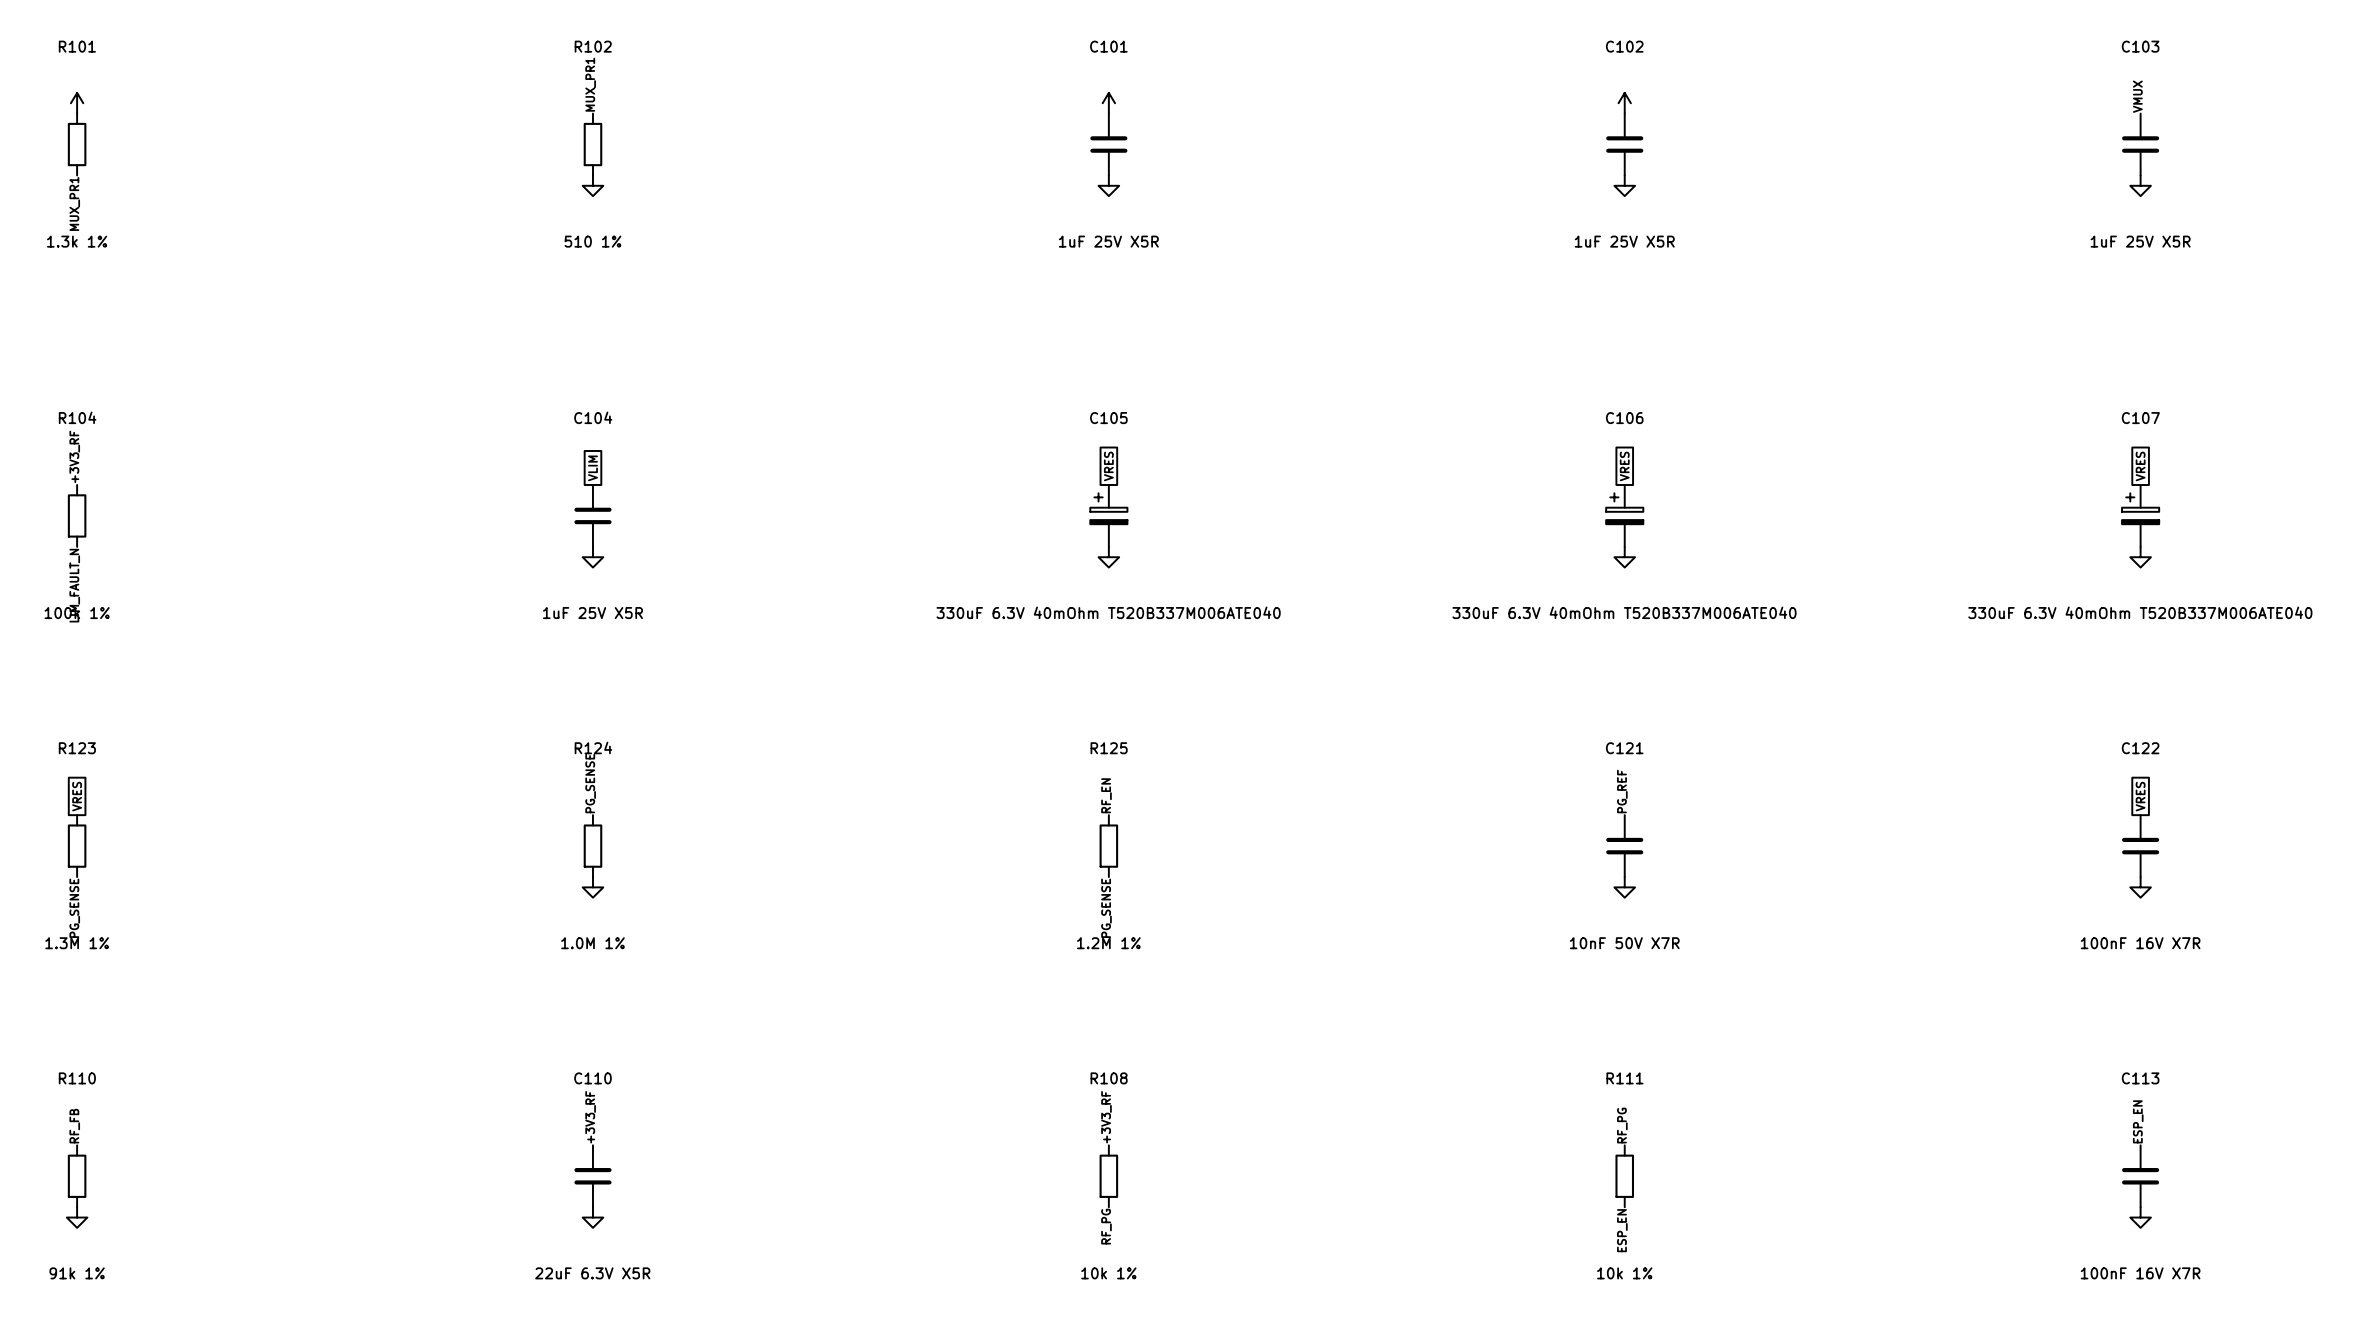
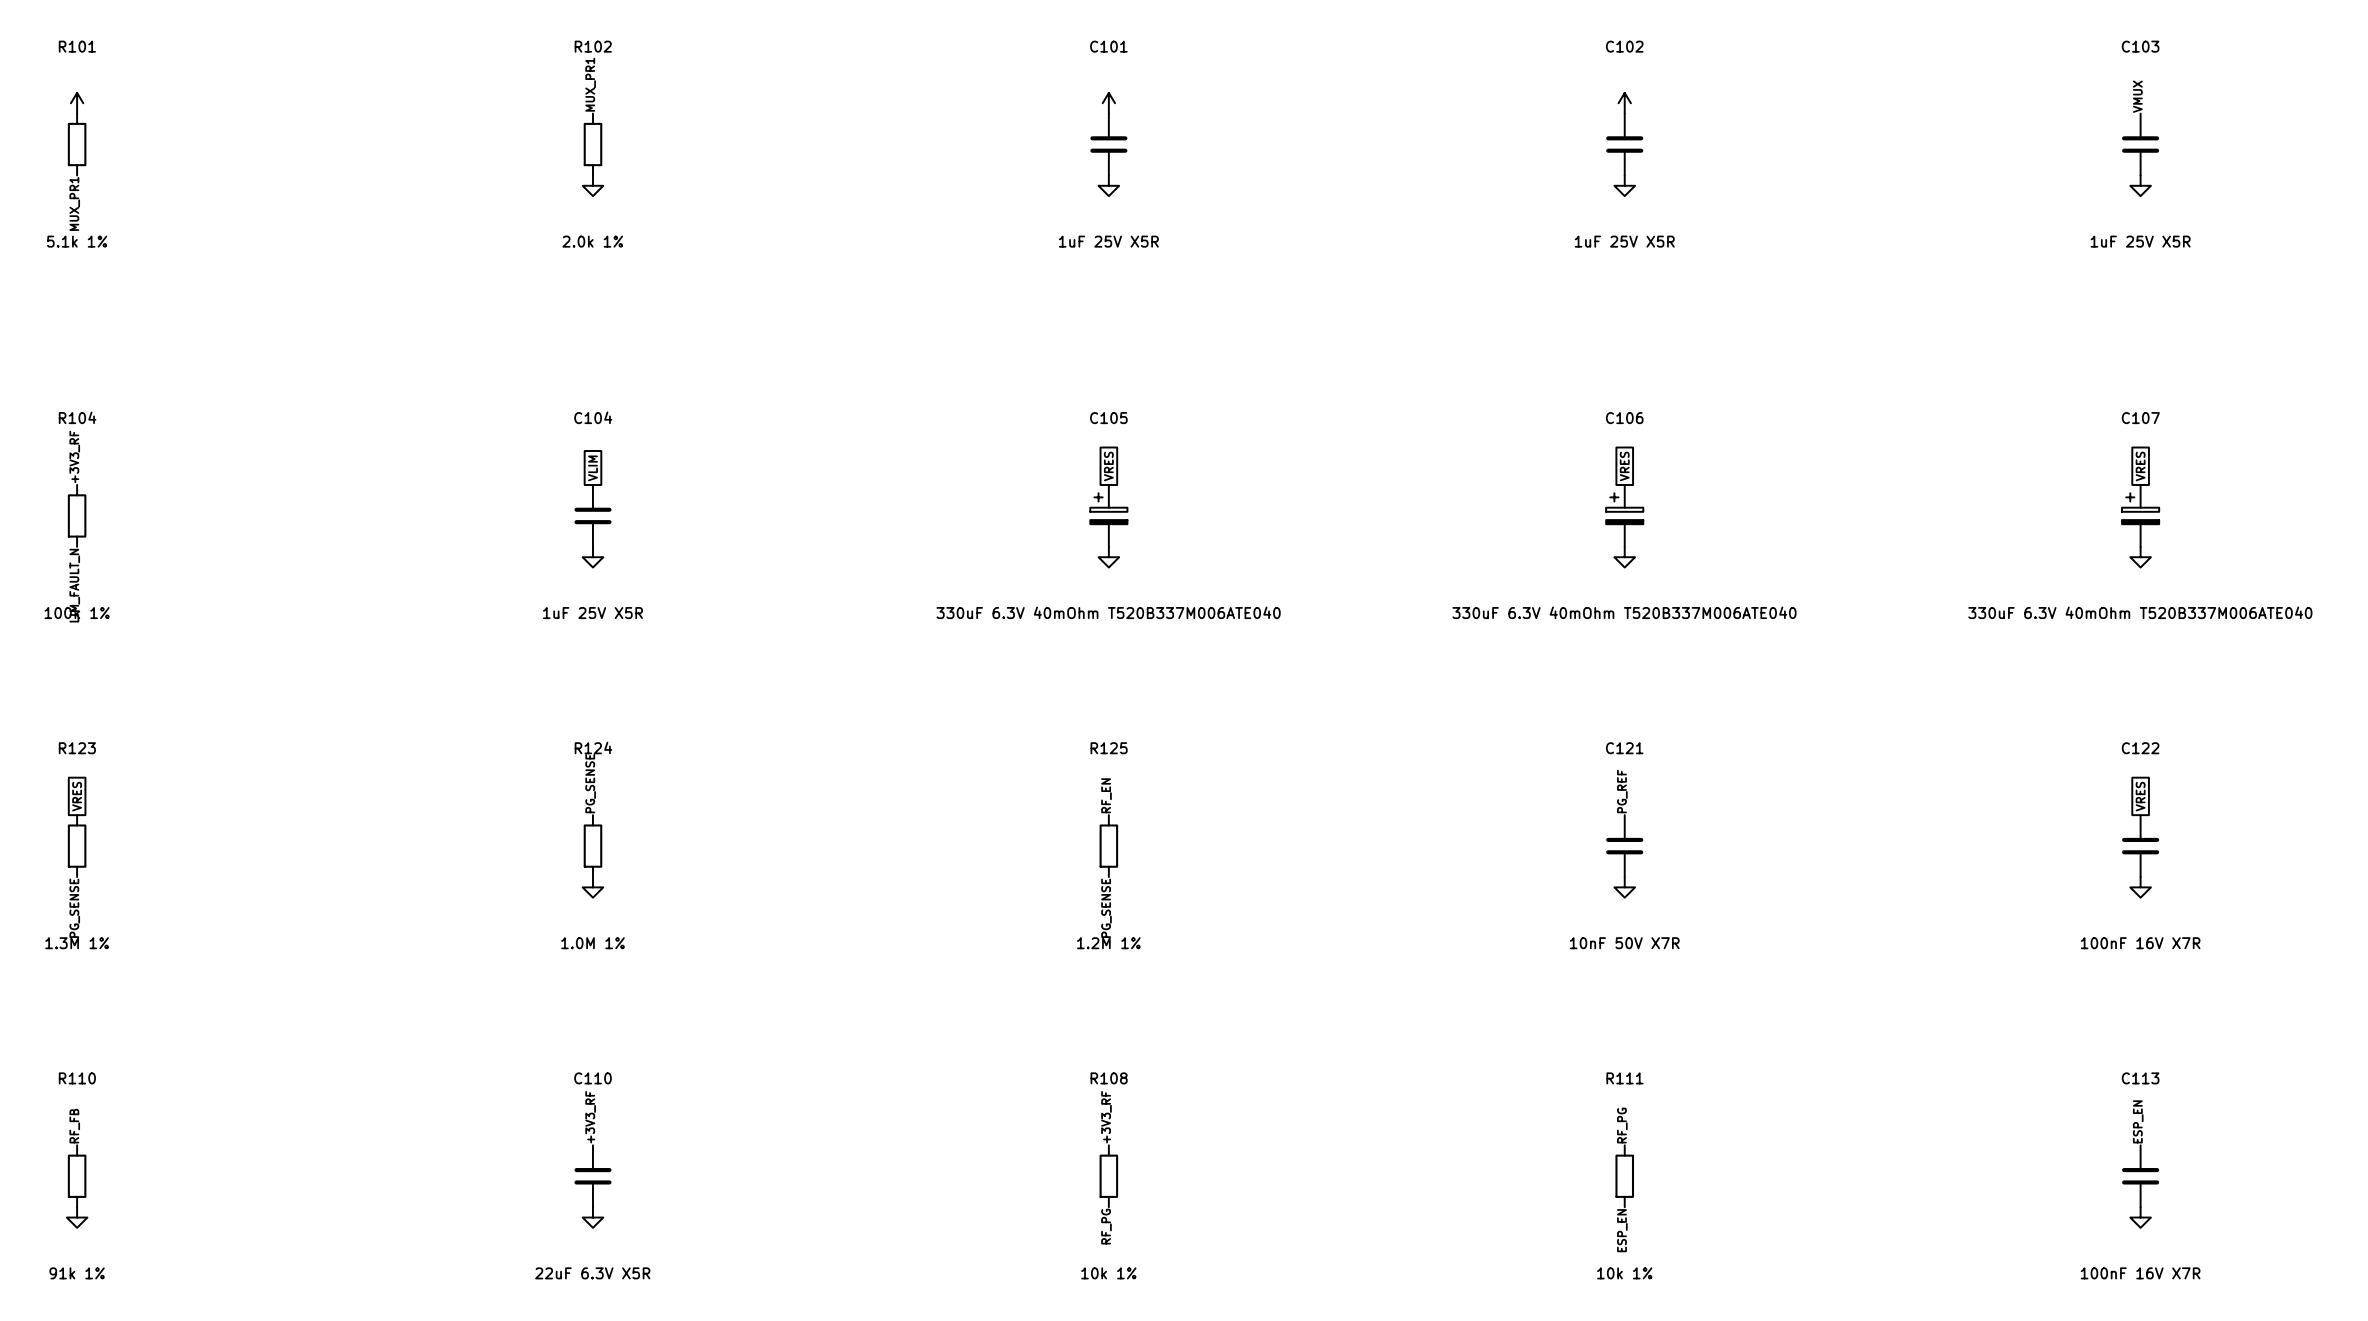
R101 value: 1.3k 1% (77, 241) -> 5.1k 1% (77, 241)
R102 value: 510 1% (592, 241) -> 2.0k 1% (592, 241)

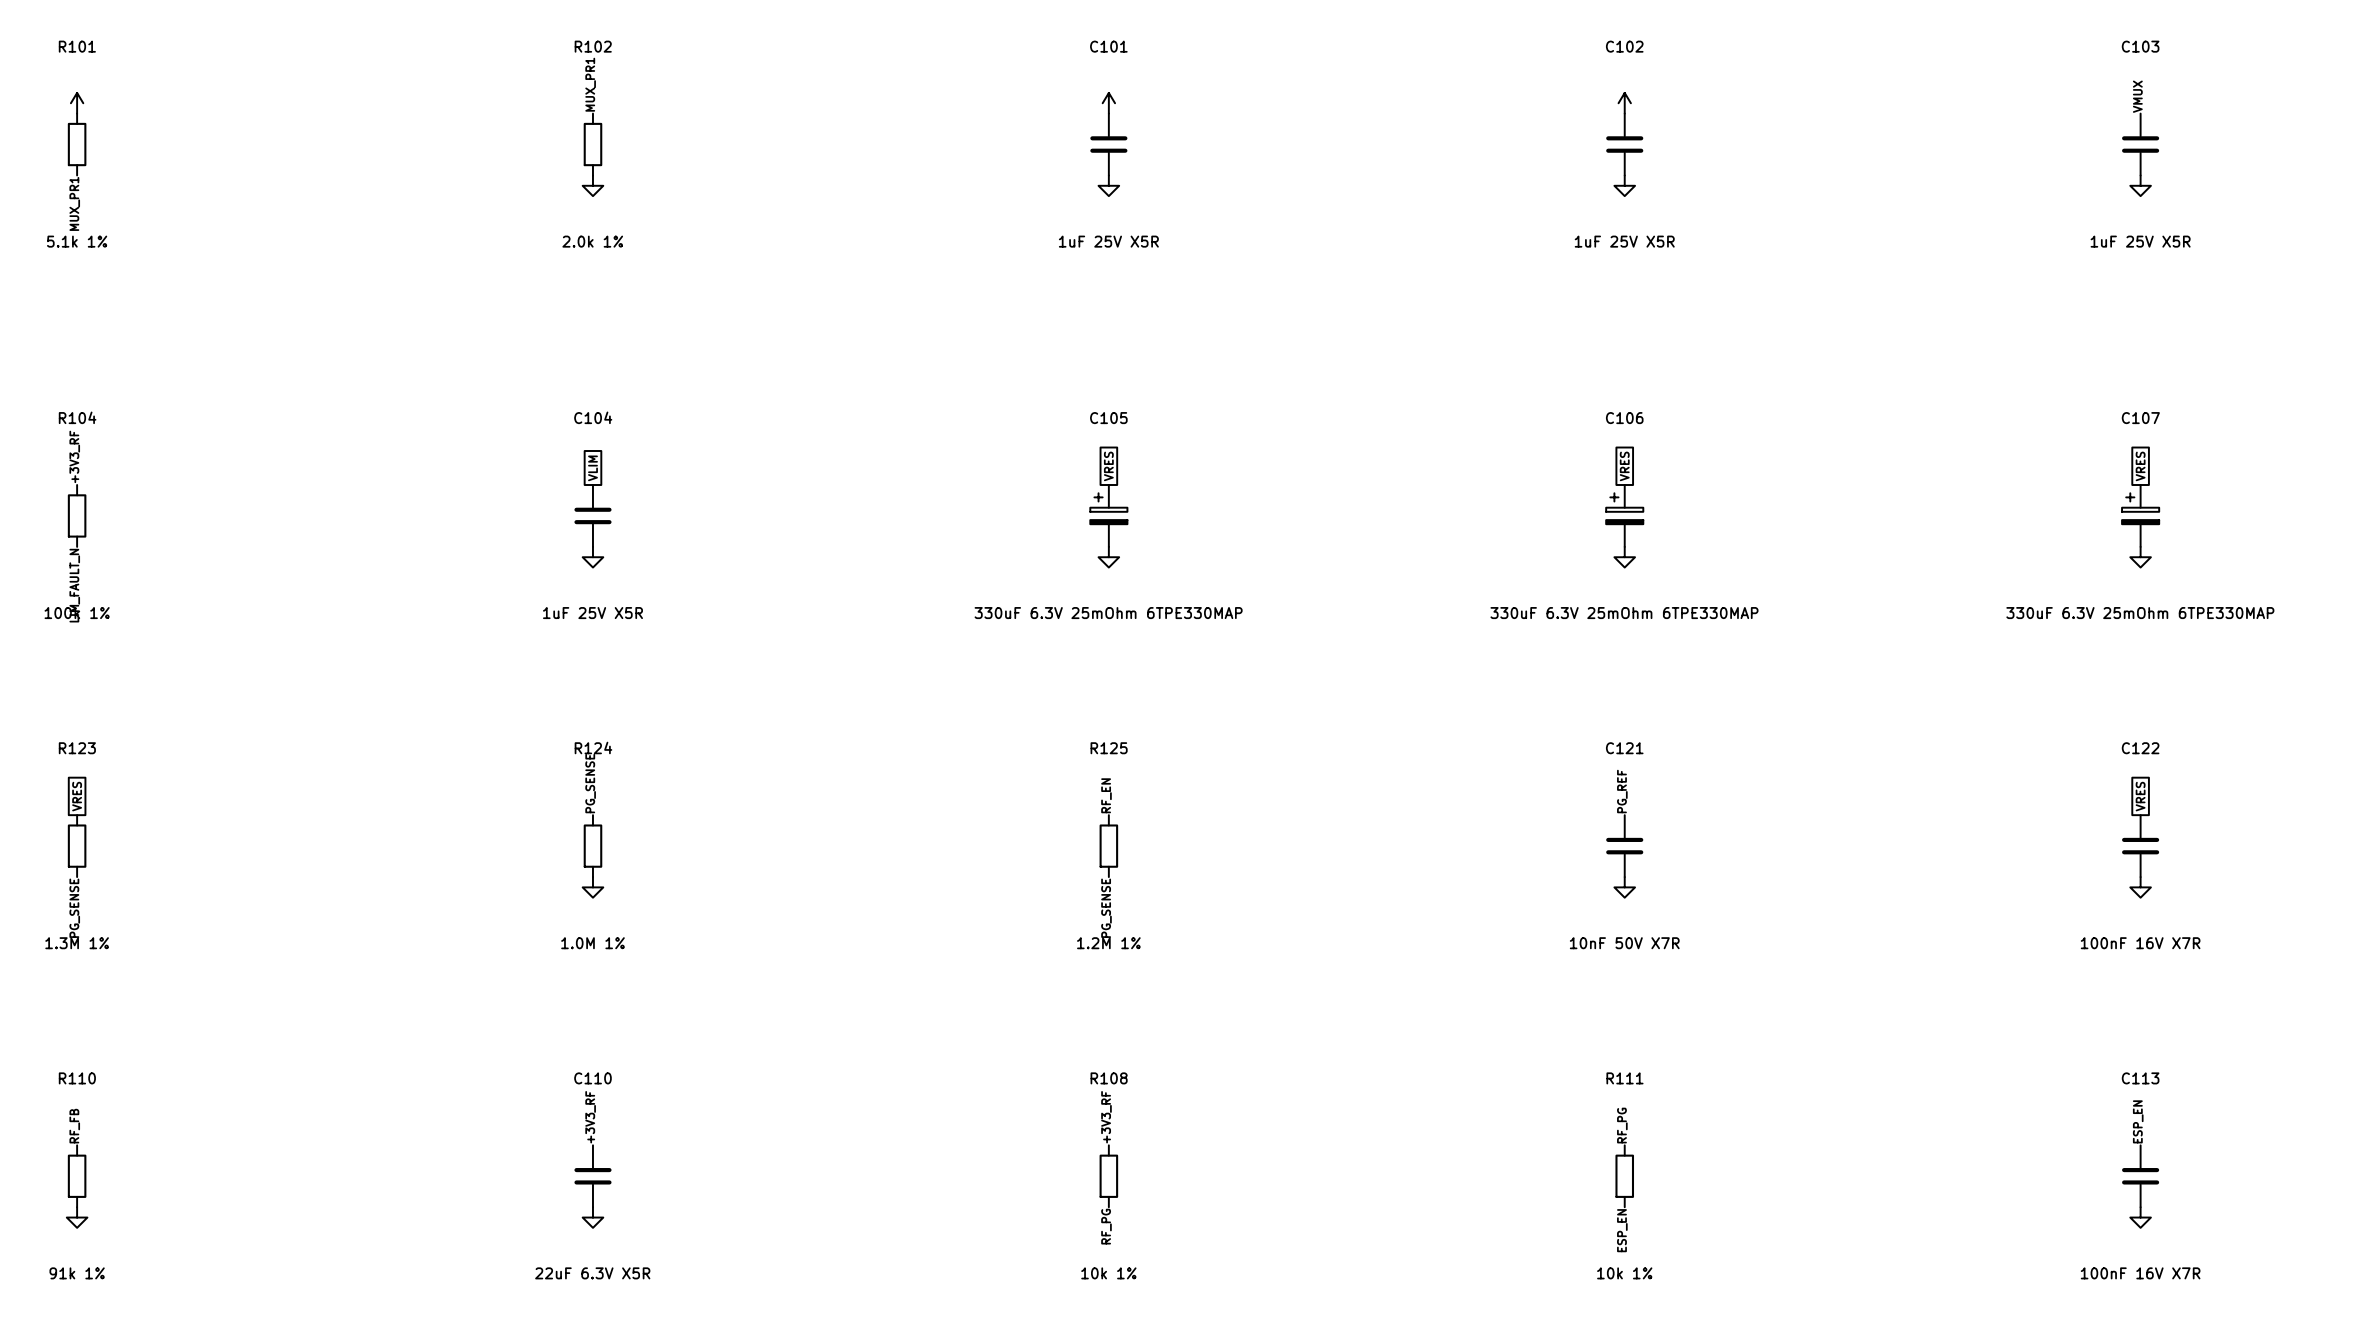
C105 value: 330uF 6.3V 40mOhm T520B337M006ATE040 (1108, 612) -> 330uF 6.3V 25mOhm 6TPE330MAP (1108, 613)
C106 value: 330uF 6.3V 40mOhm T520B337M006ATE040 (1624, 612) -> 330uF 6.3V 25mOhm 6TPE330MAP (1624, 613)
C107 value: 330uF 6.3V 40mOhm T520B337M006ATE040 (2140, 612) -> 330uF 6.3V 25mOhm 6TPE330MAP (2140, 613)

